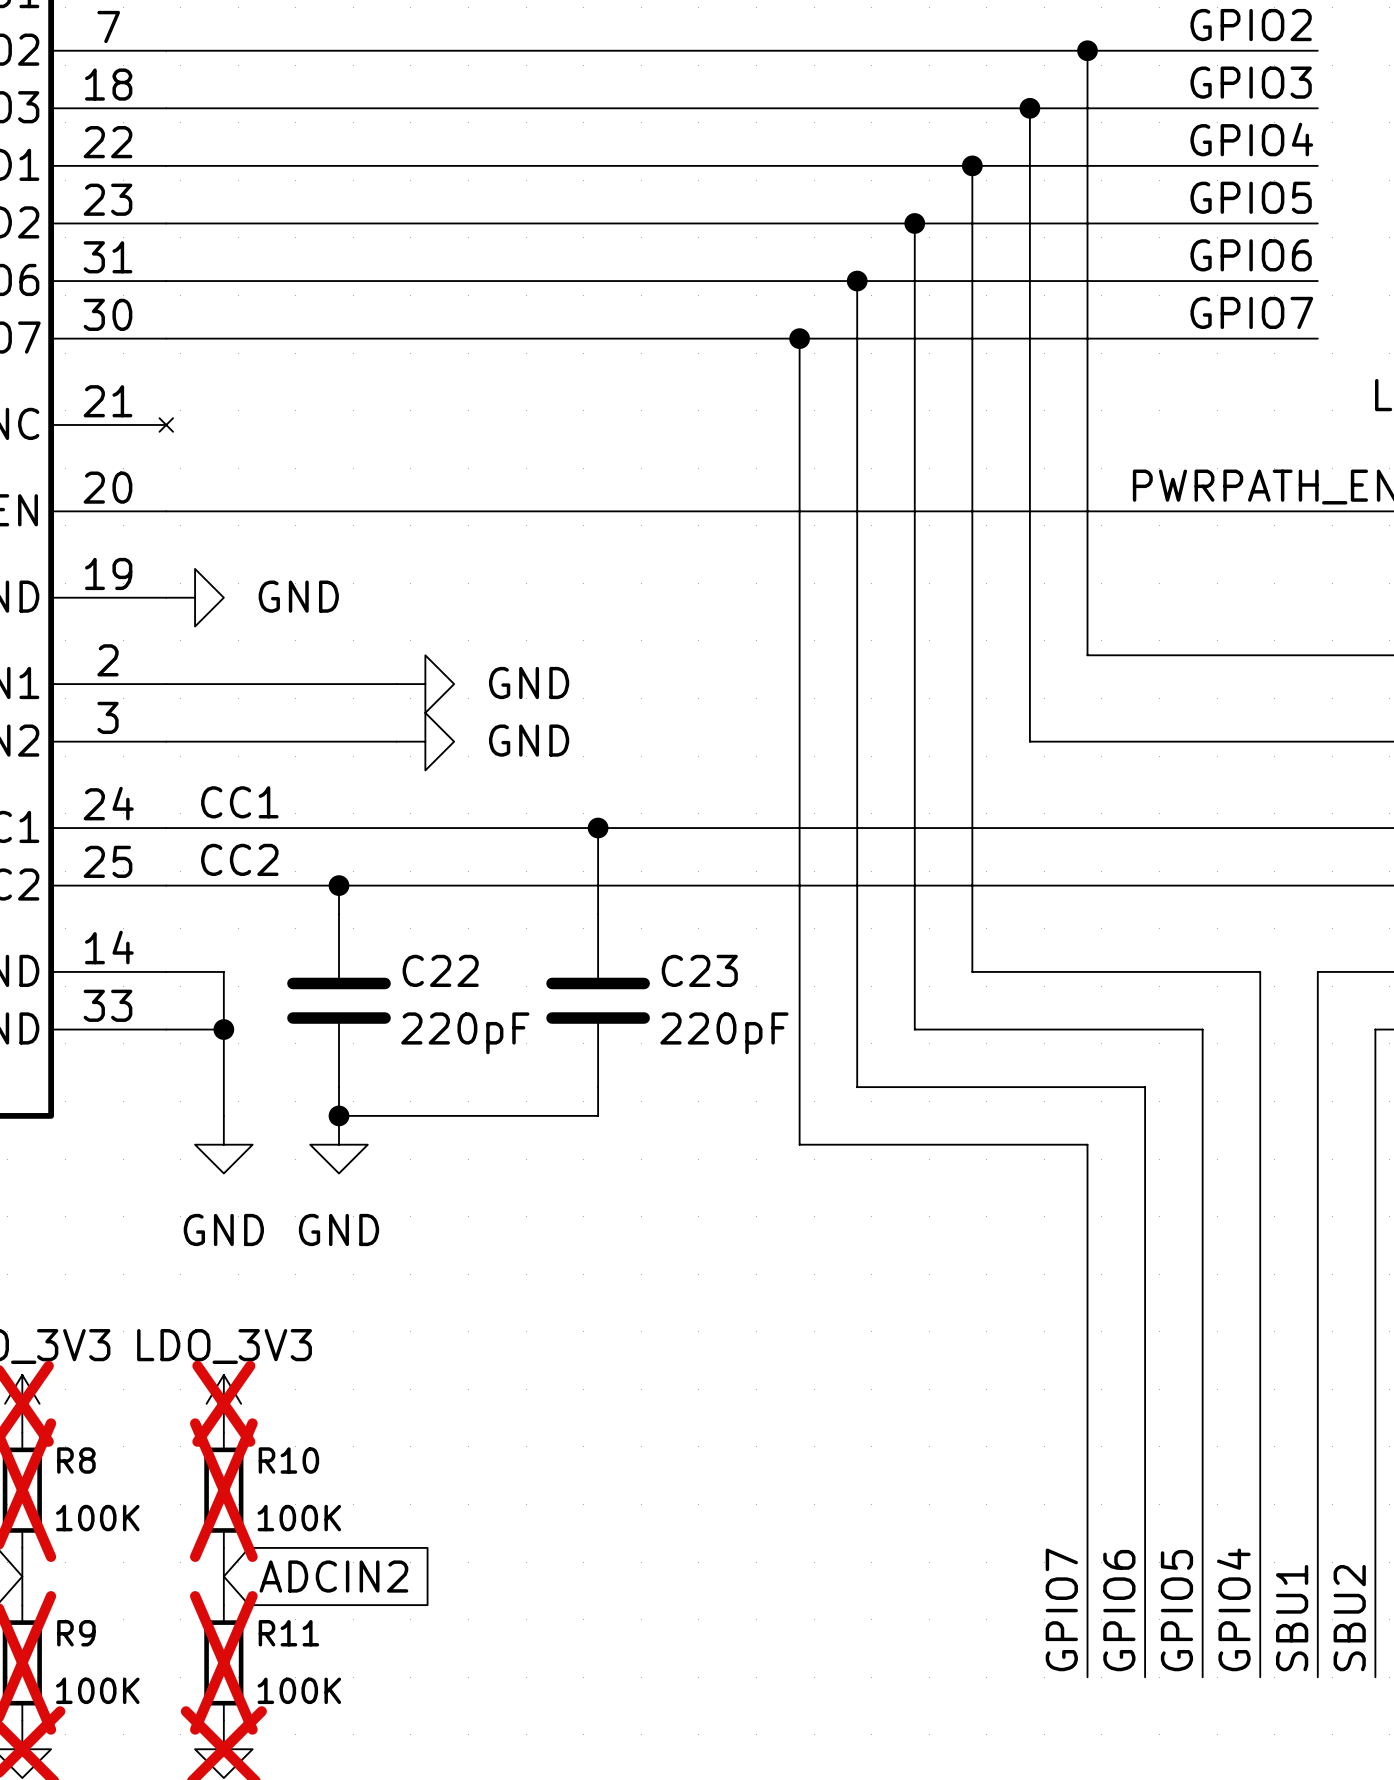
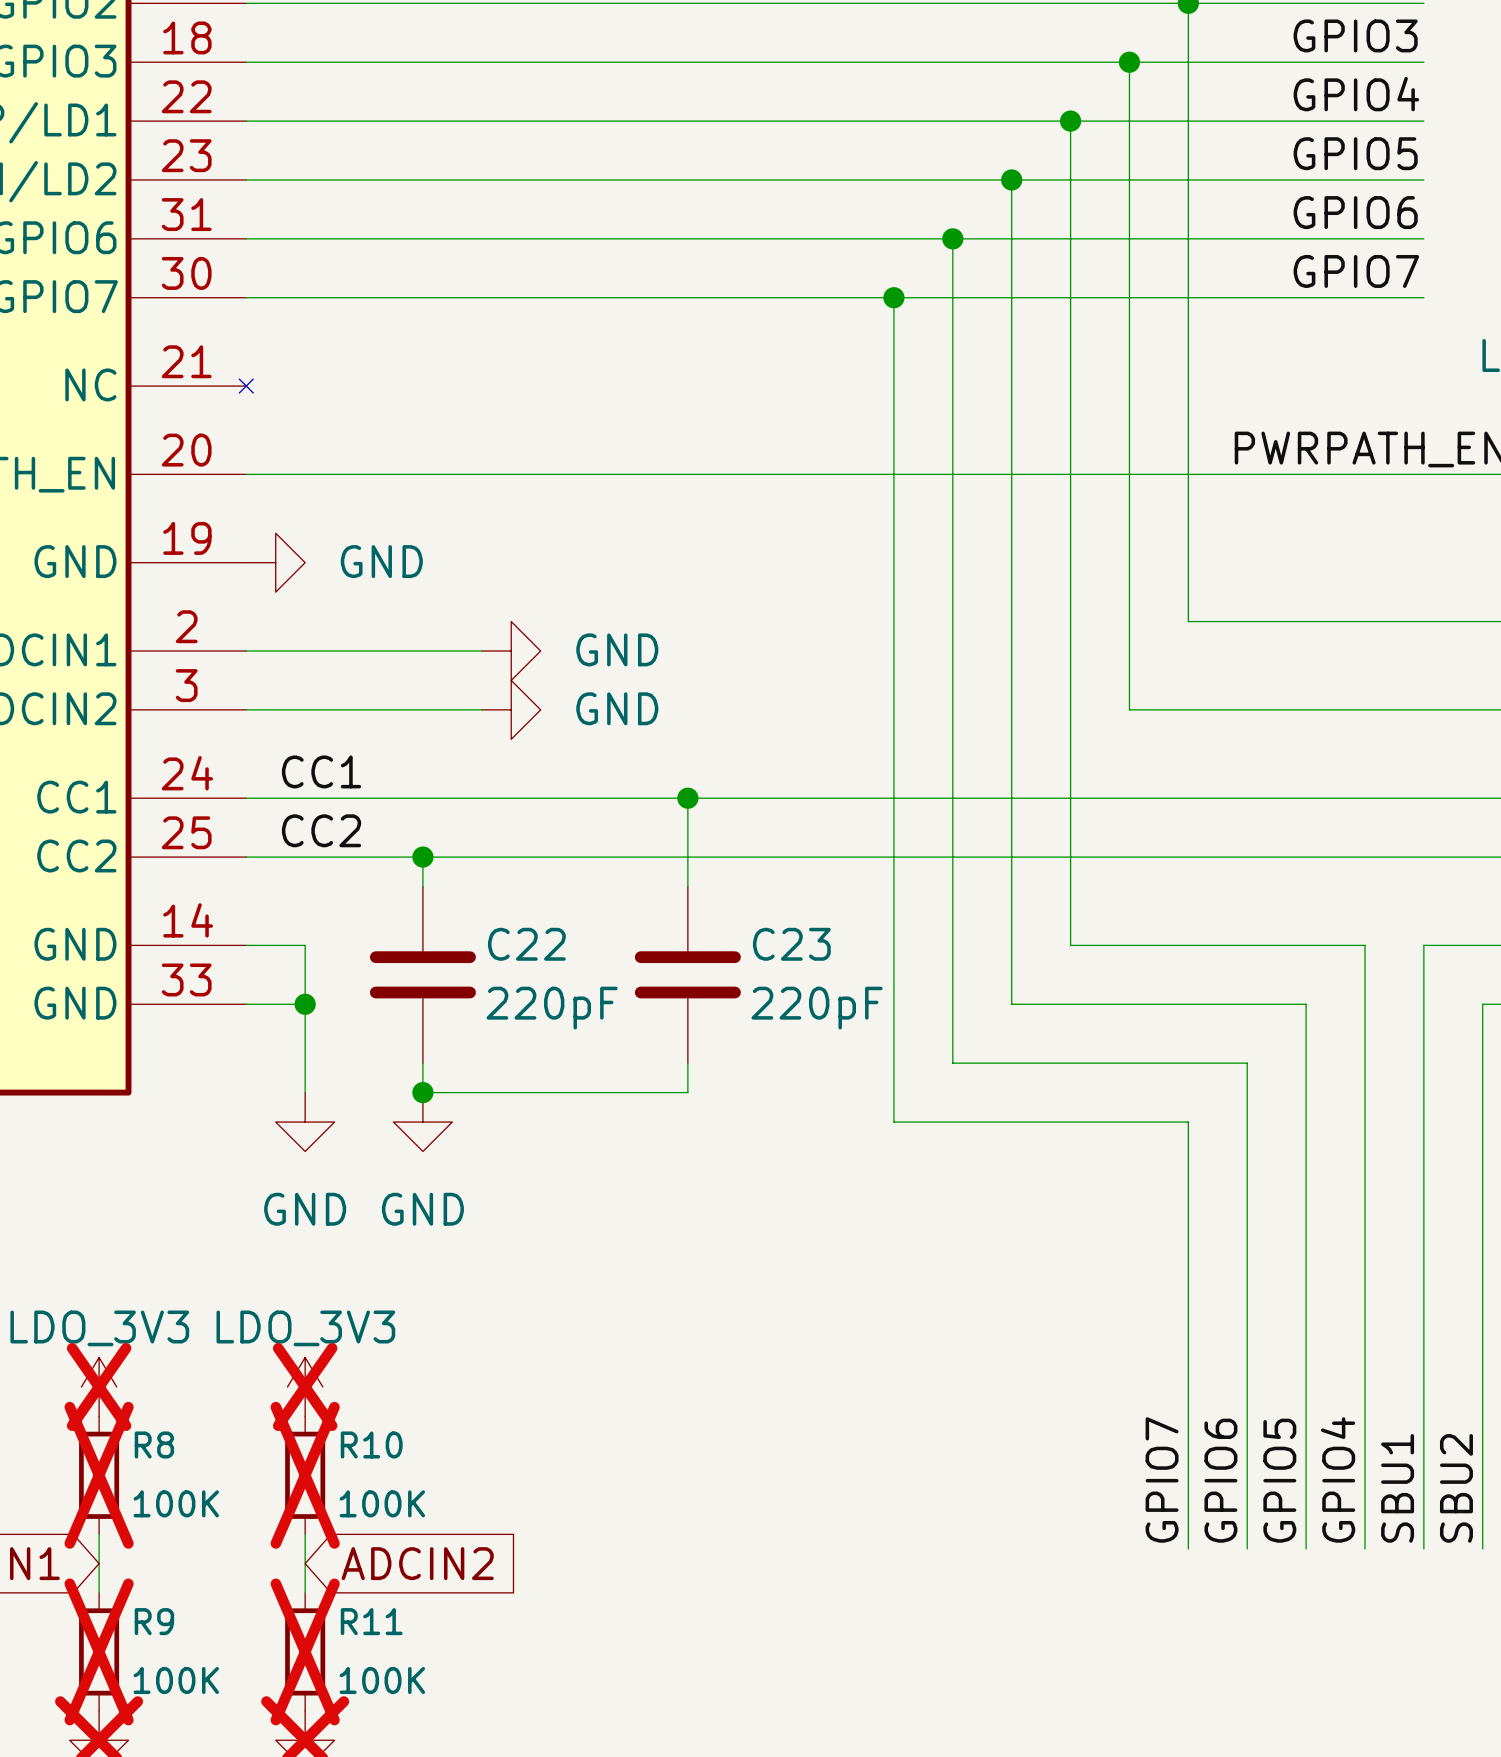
wire: (1087, 1562) (1087, 1677) -> none
wire: (1145, 1562) (1145, 1677) -> none
wire: (1202, 1562) (1202, 1677) -> none
wire: (1260, 1562) (1260, 1677) -> none
wire: (1317, 1562) (1317, 1677) -> none
wire: (1375, 1562) (1375, 1677) -> none
label position: GPIO7 (1061, 1609) -> GPIO7 (1162, 1479)
label position: GPIO4 (1233, 1609) -> GPIO4 (1338, 1479)
label position: GPIO6 (1119, 1610) -> GPIO6 (1220, 1480)
label position: GPIO5 (1176, 1610) -> GPIO5 (1279, 1480)
label position: SBU1 (1292, 1618) -> SBU1 (1397, 1488)
label position: SBU2 (1349, 1618) -> SBU2 (1456, 1488)

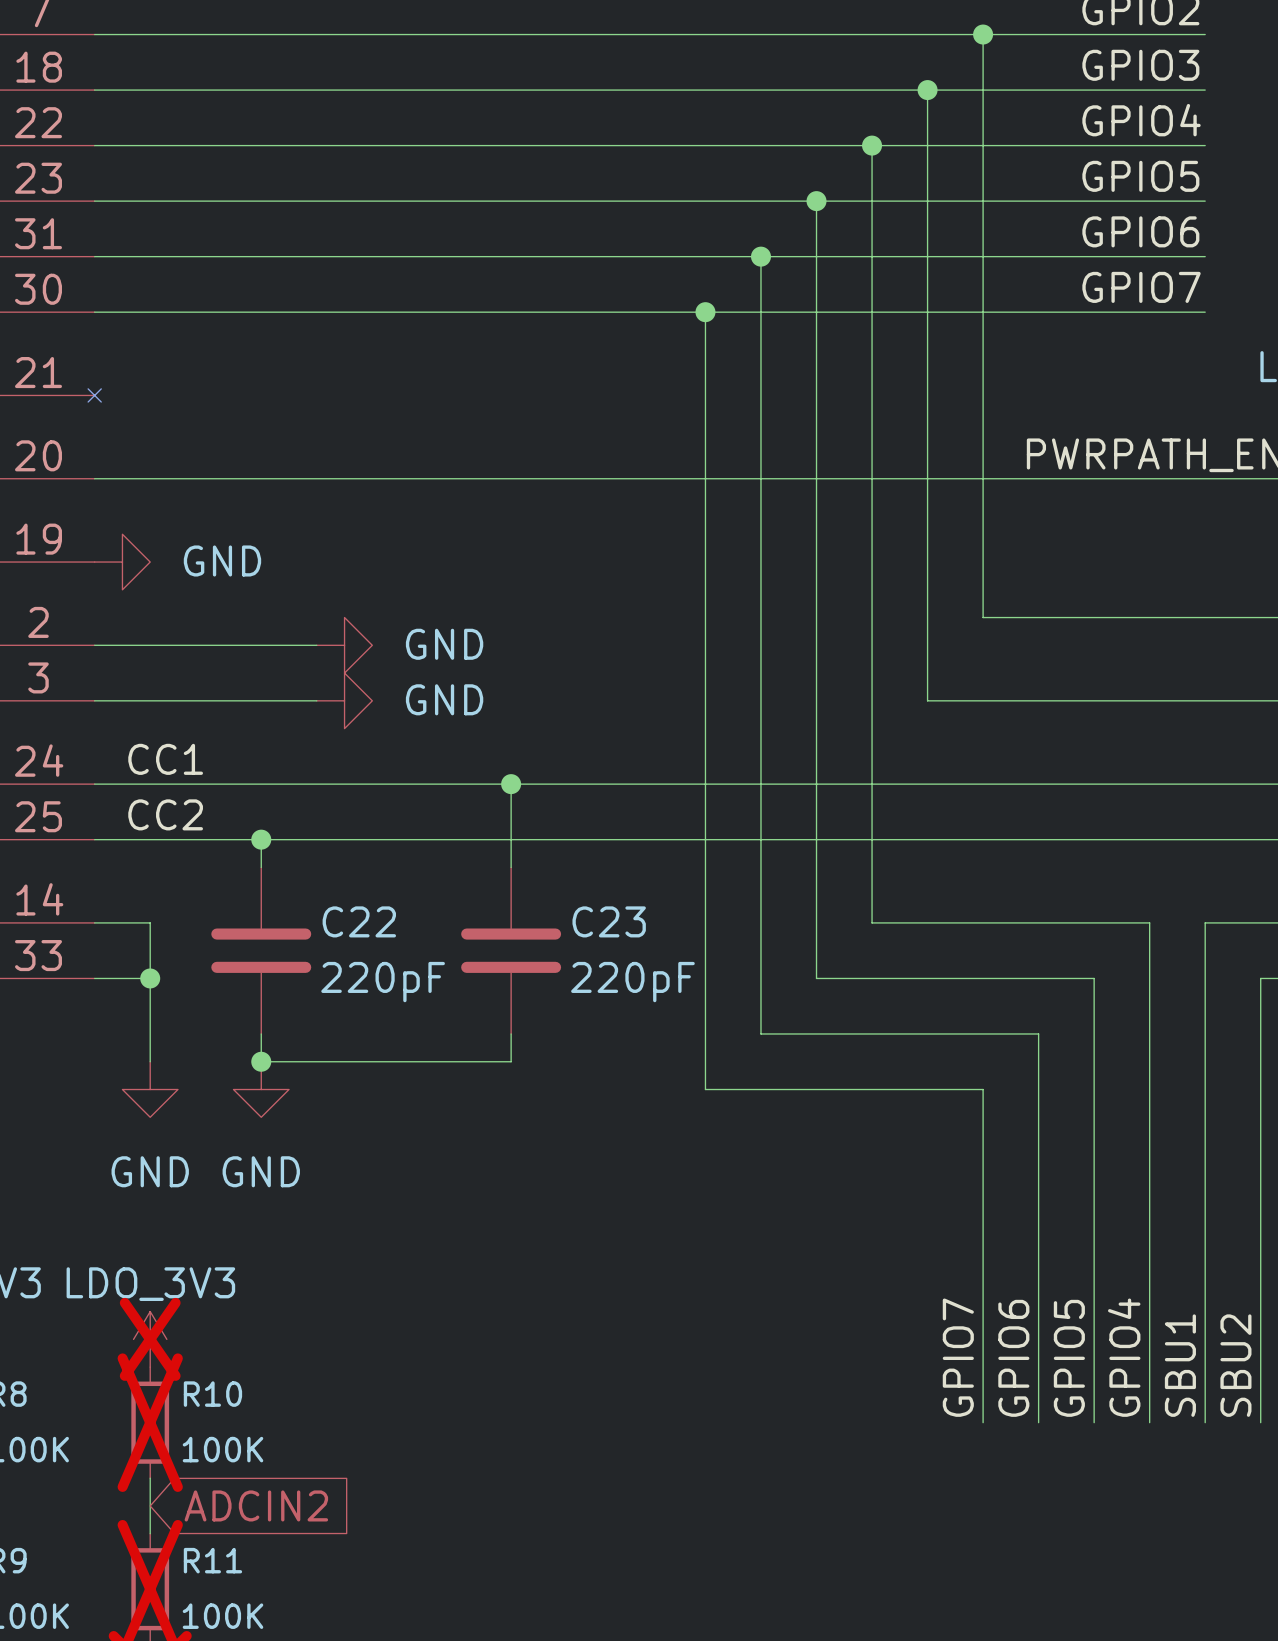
wire: (1188, 1475) (1188, 1548) -> none
wire: (1247, 1475) (1247, 1548) -> none
wire: (1306, 1475) (1306, 1548) -> none
wire: (1364, 1475) (1364, 1548) -> none
wire: (1423, 1475) (1423, 1548) -> none
wire: (1482, 1475) (1482, 1548) -> none
label position: GPIO7 (1162, 1479) -> GPIO7 (958, 1357)
label position: GPIO4 (1338, 1479) -> GPIO4 (1124, 1357)
label position: GPIO6 (1220, 1480) -> GPIO6 (1013, 1358)
label position: GPIO5 (1279, 1480) -> GPIO5 (1069, 1358)
label position: SBU1 (1397, 1488) -> SBU1 (1180, 1365)
label position: SBU2 (1456, 1488) -> SBU2 (1235, 1365)

